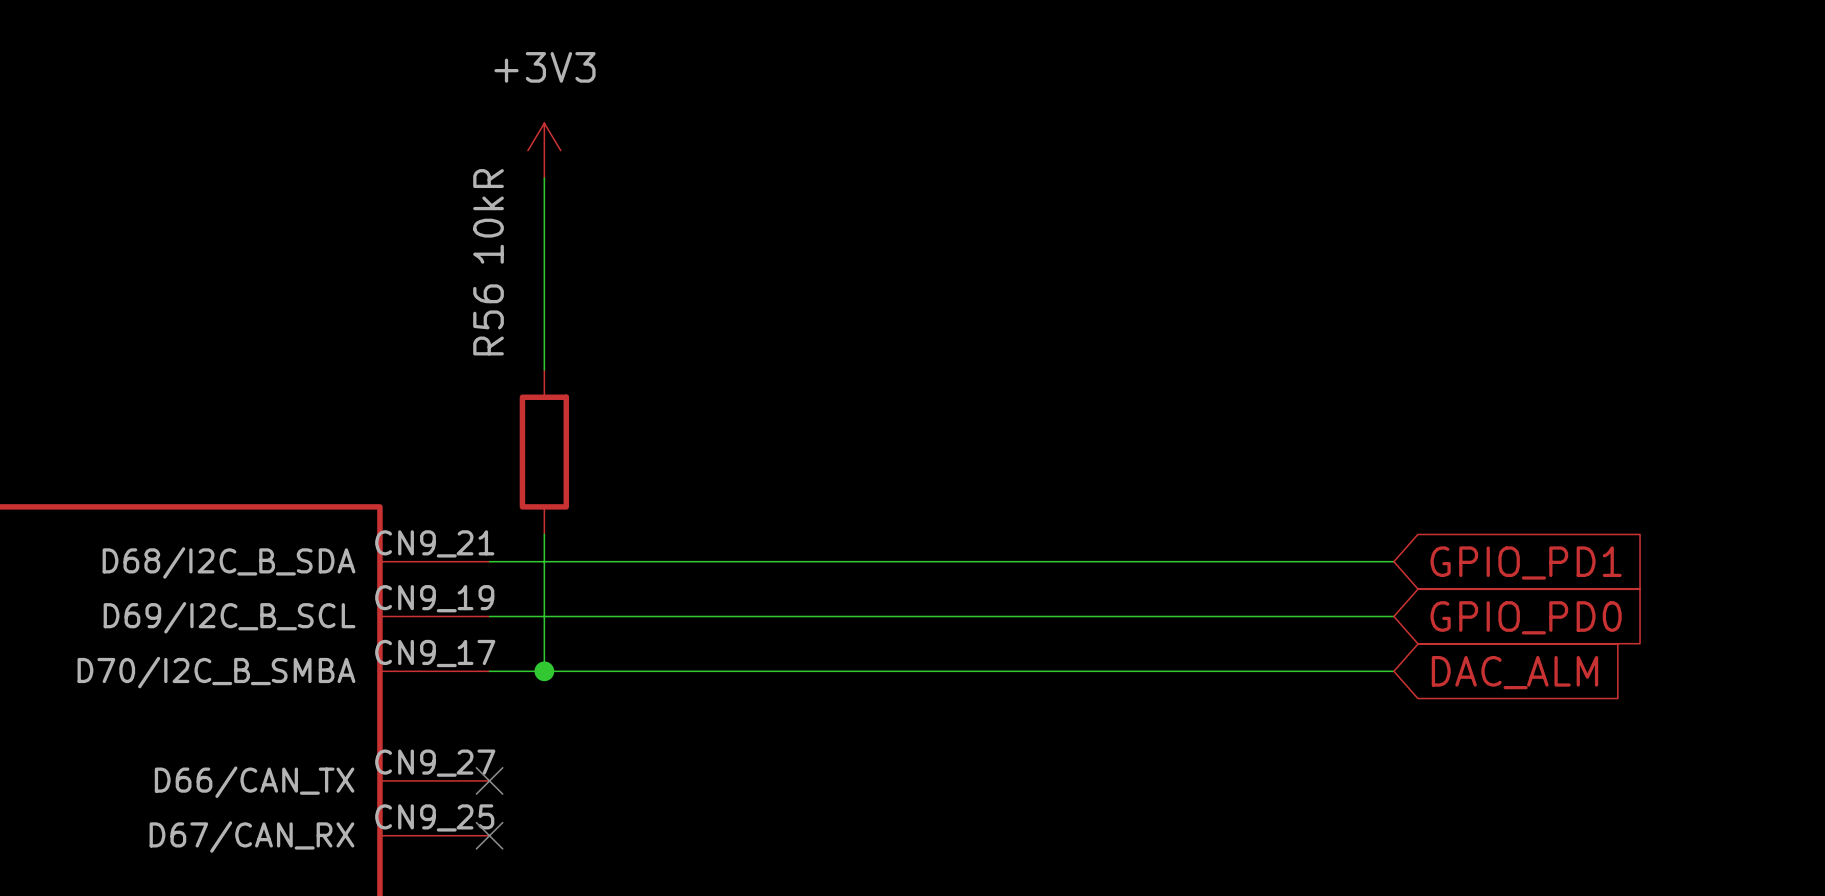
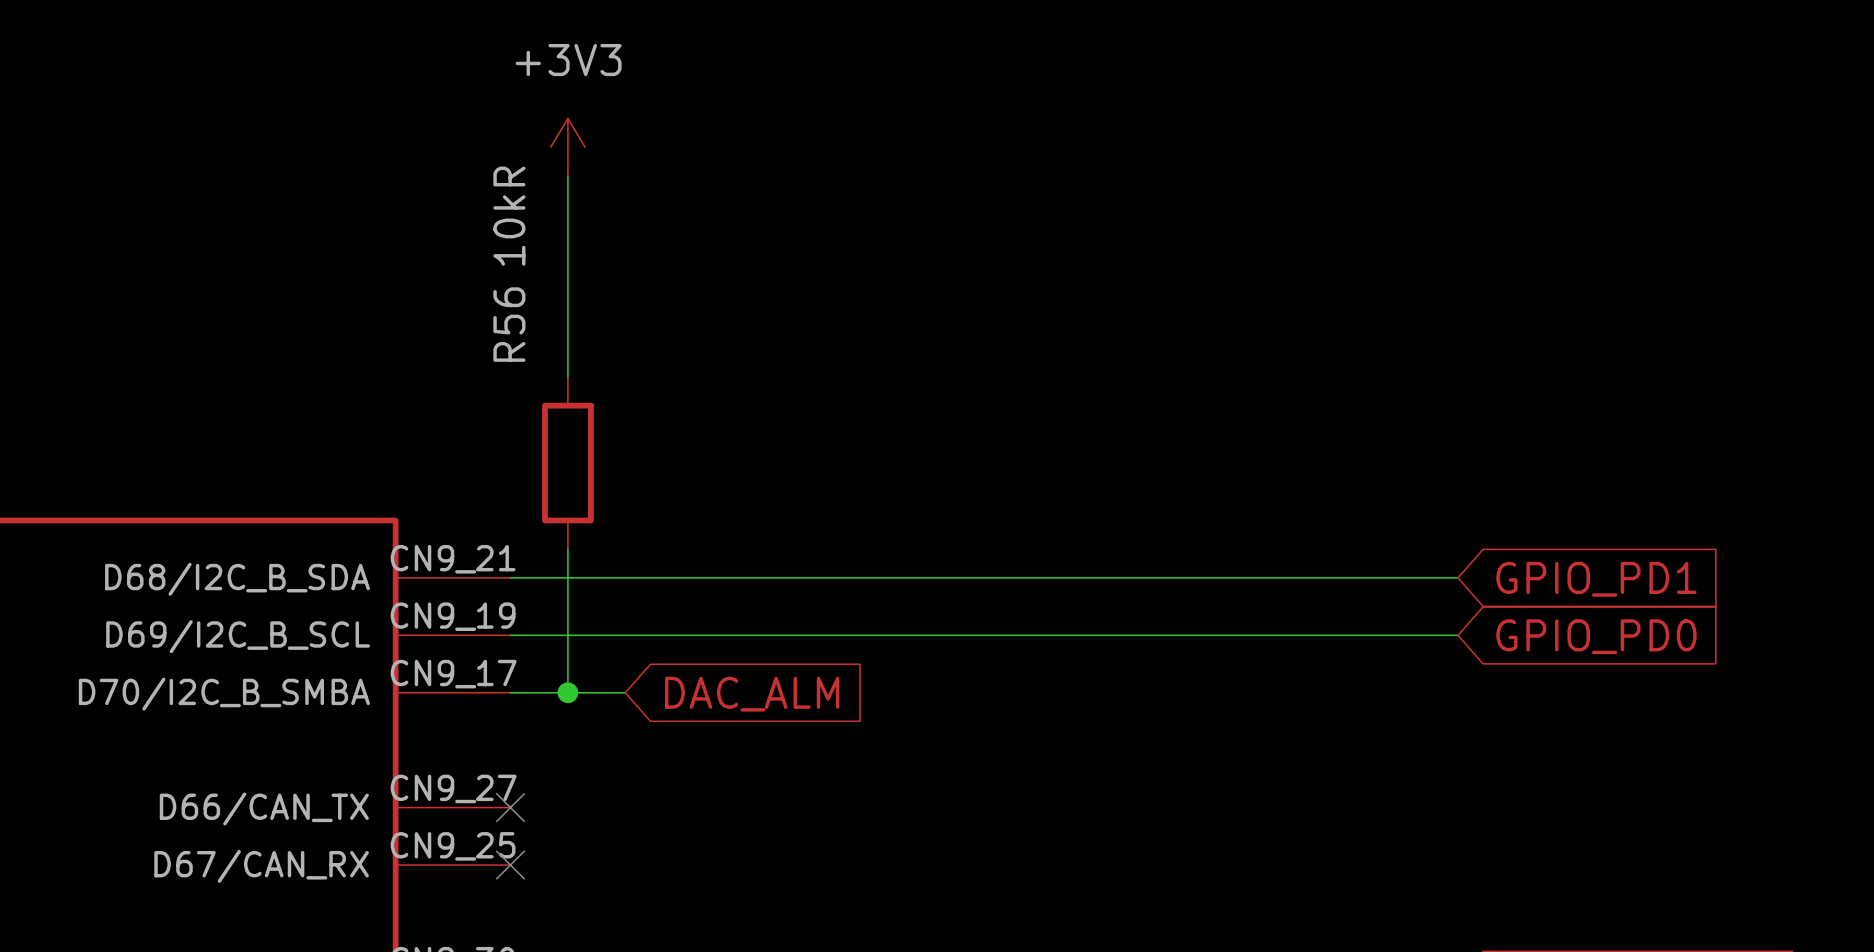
wire: (599, 671) (1393, 671) -> none
global label: none -> DAC_ALM (752, 694)
global label: DAC_ALM (1514, 672) -> none

